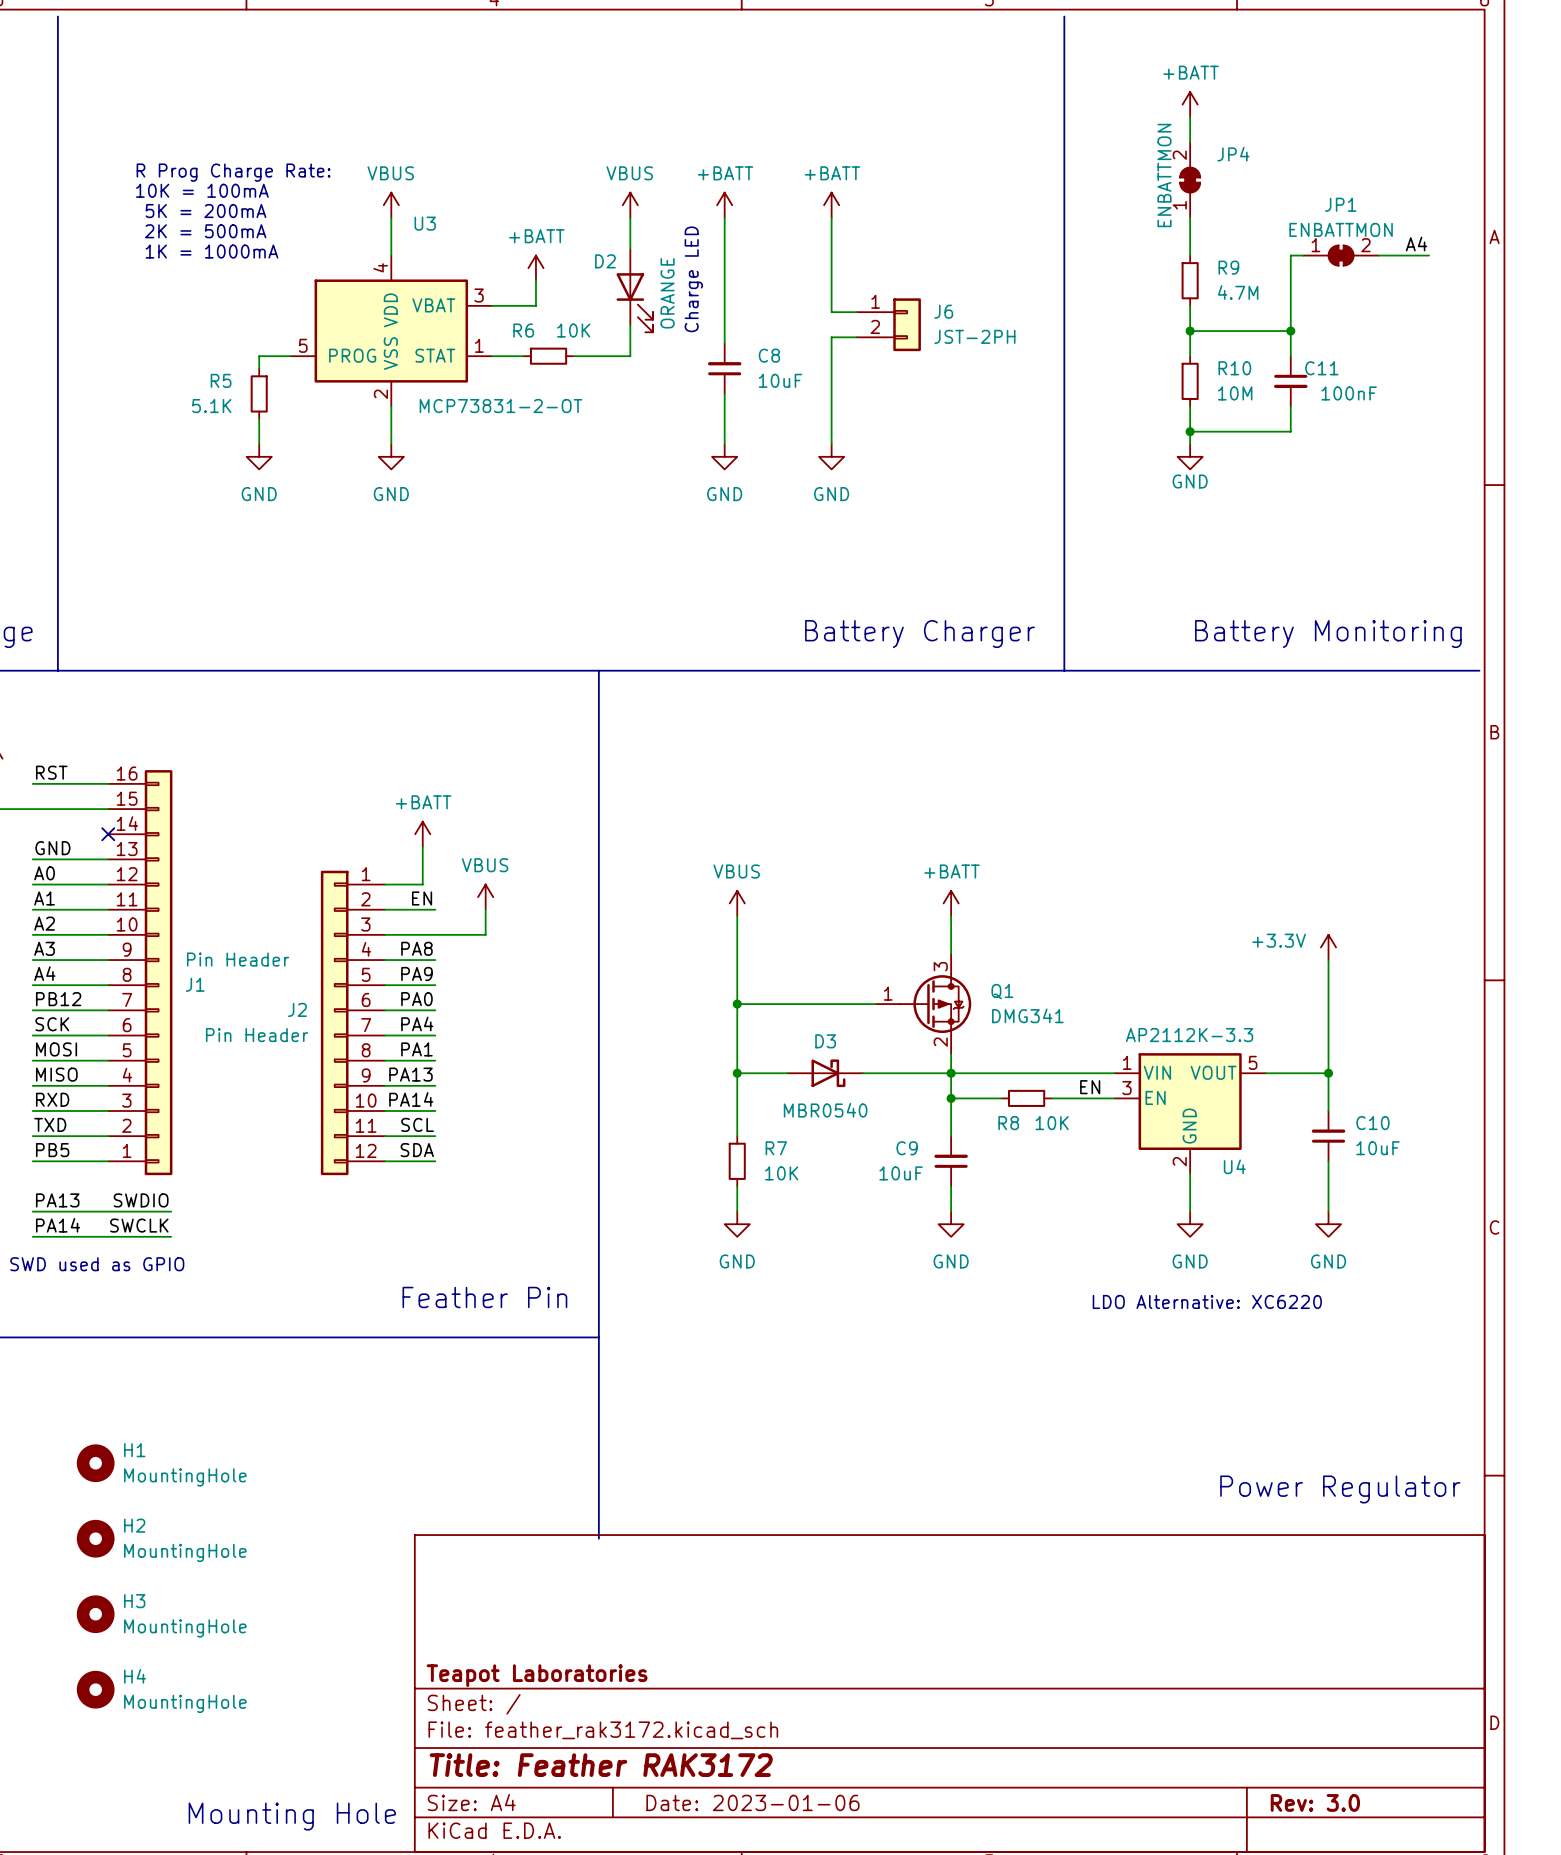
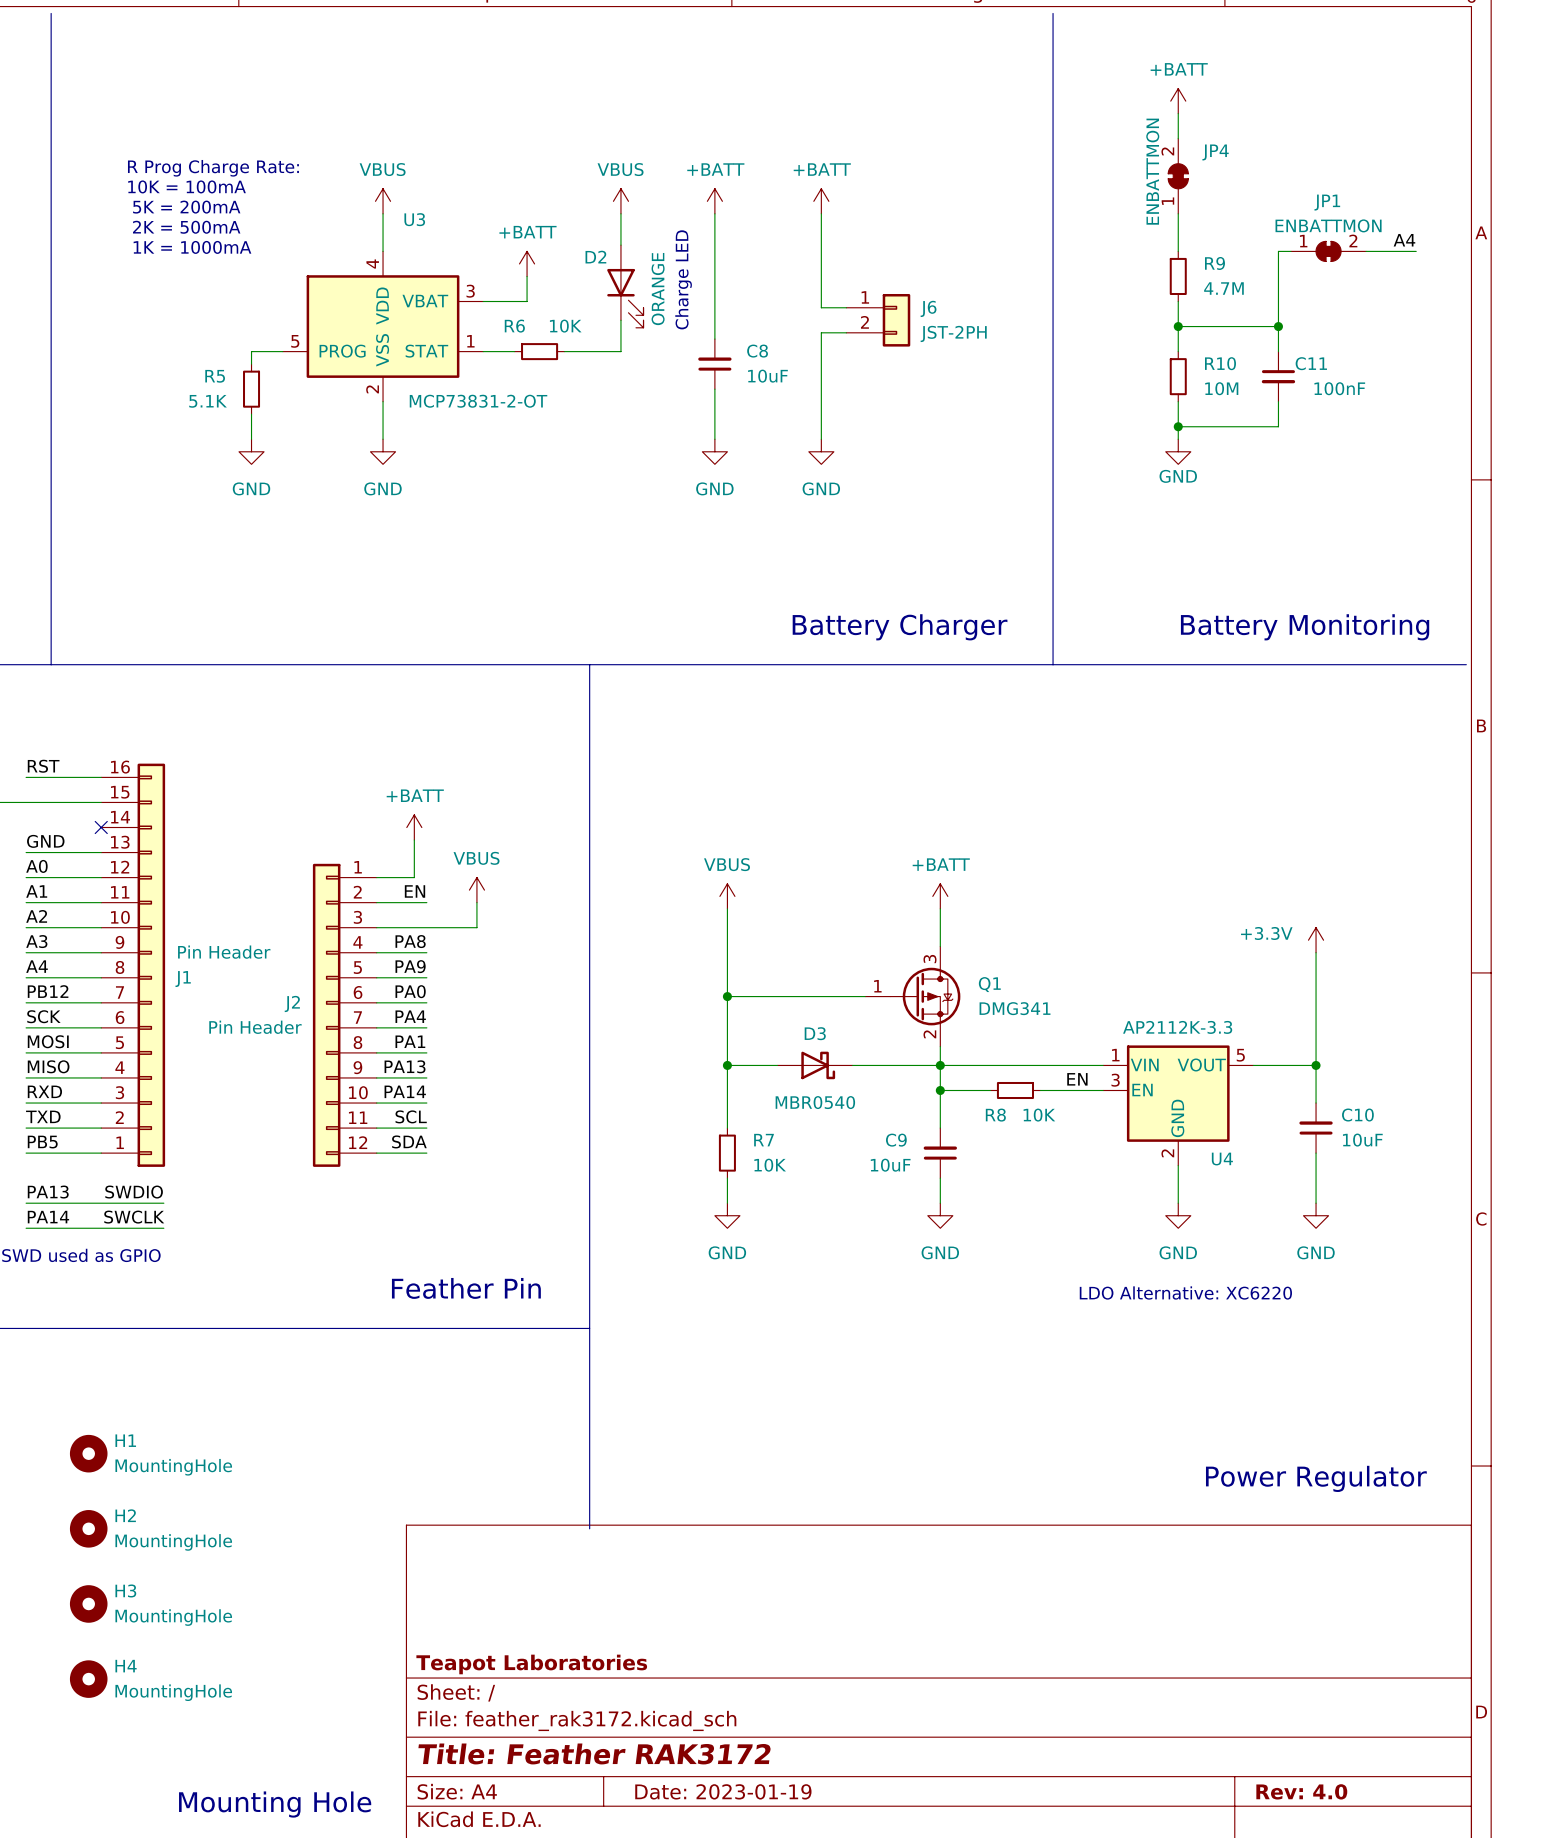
title block: Date: 2023-01-06 (752, 1802) -> Date: 2023-01-19 (723, 1791)
title block: Rev: 3.0 (1315, 1802) -> Rev: 4.0 (1301, 1791)

